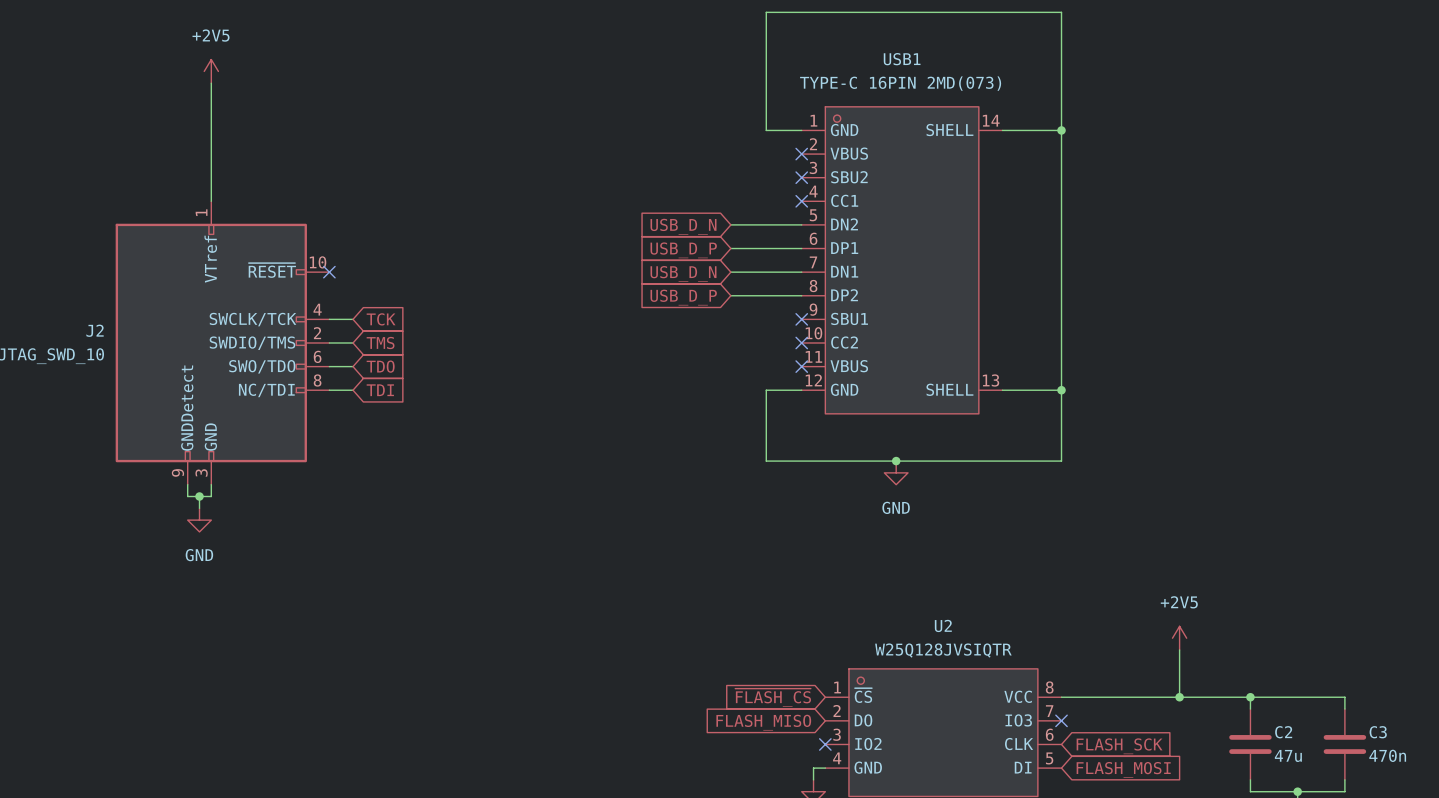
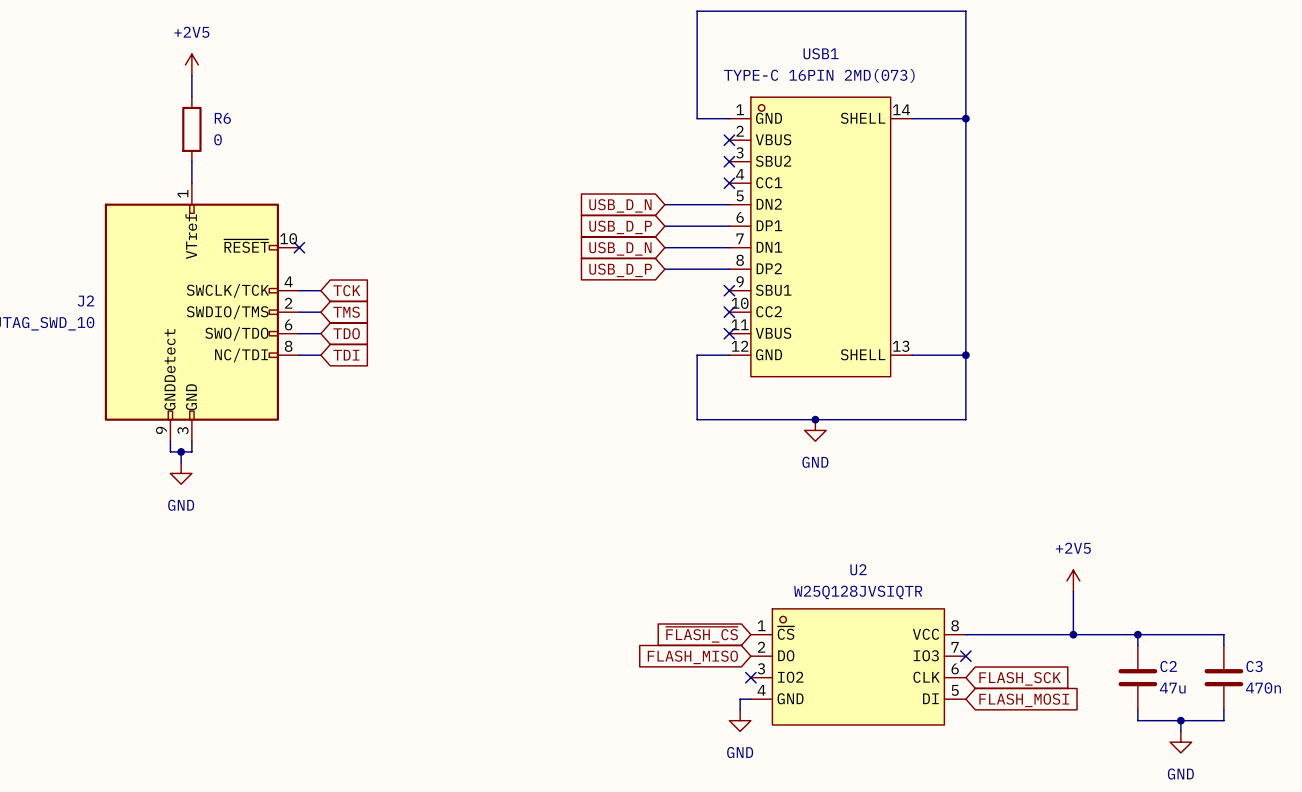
wire: (211, 106) (211, 177) -> none
R6: none -> 0 (191, 129)

